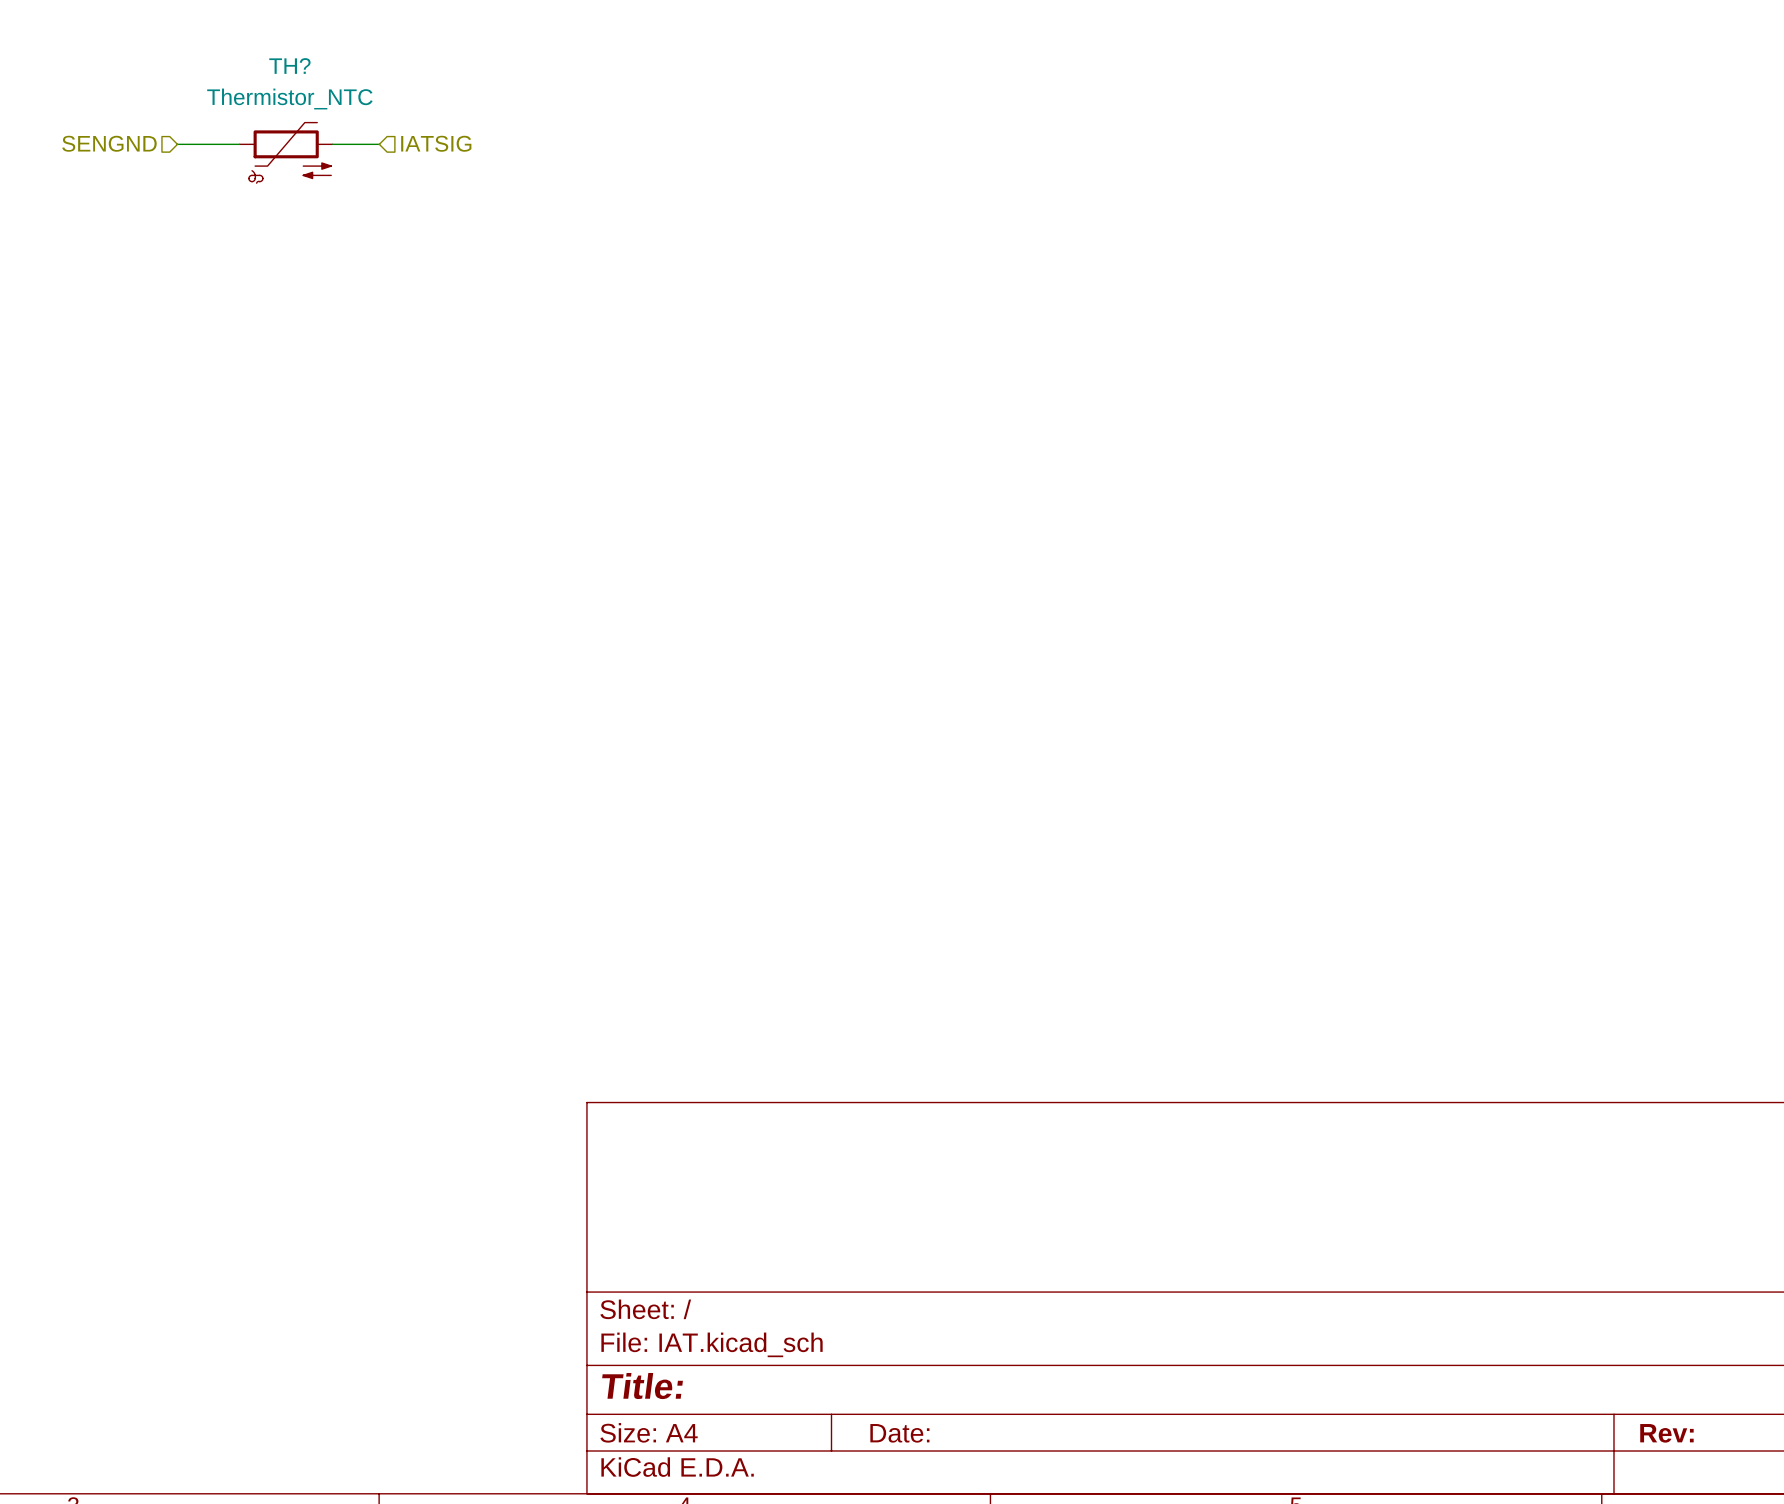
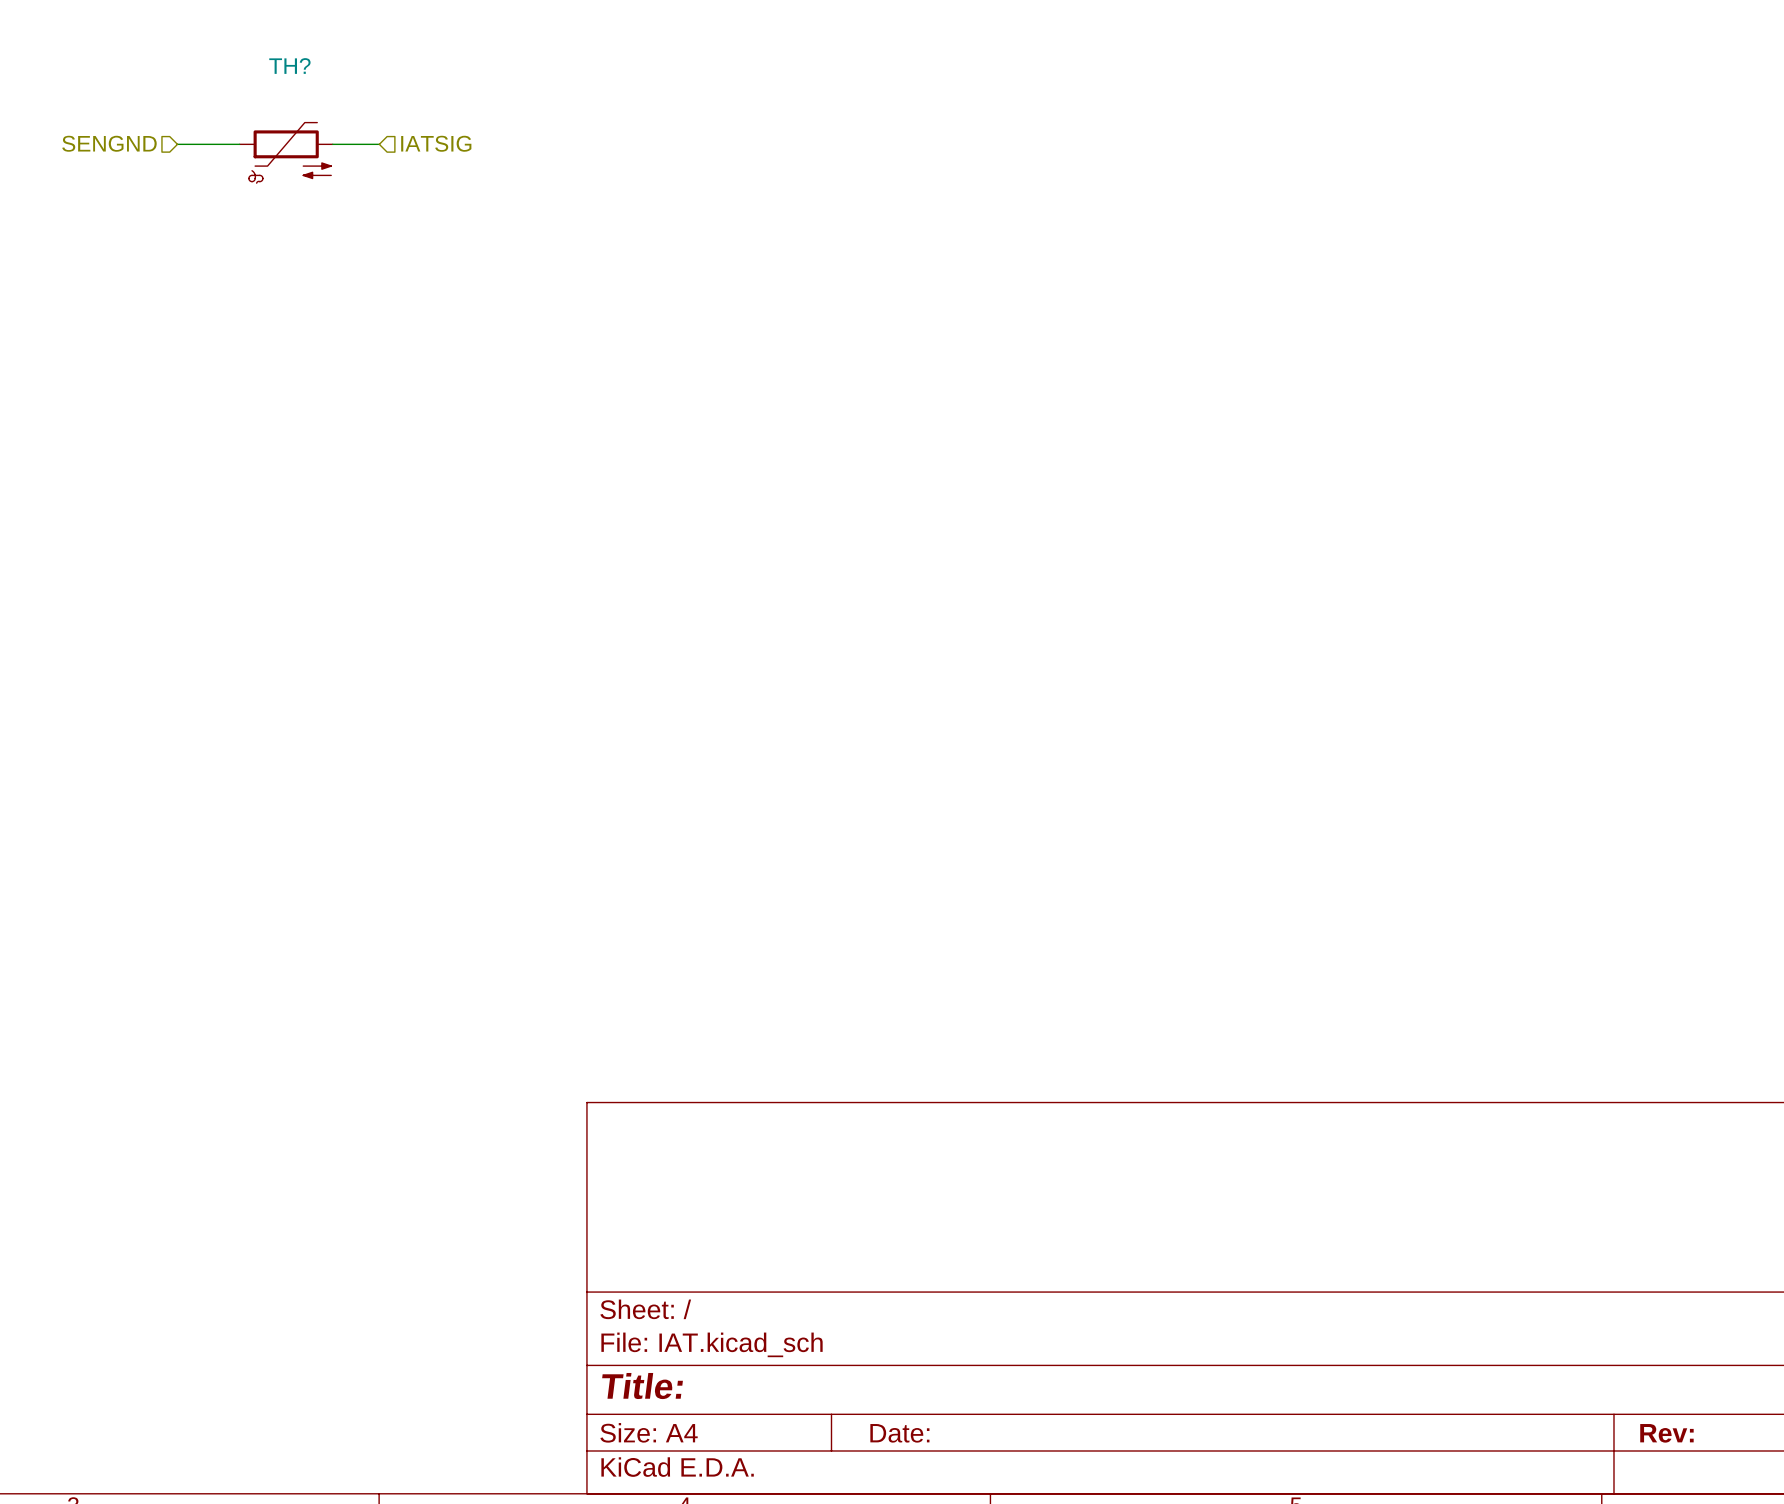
TH? value: Thermistor_NTC (289, 99) -> none

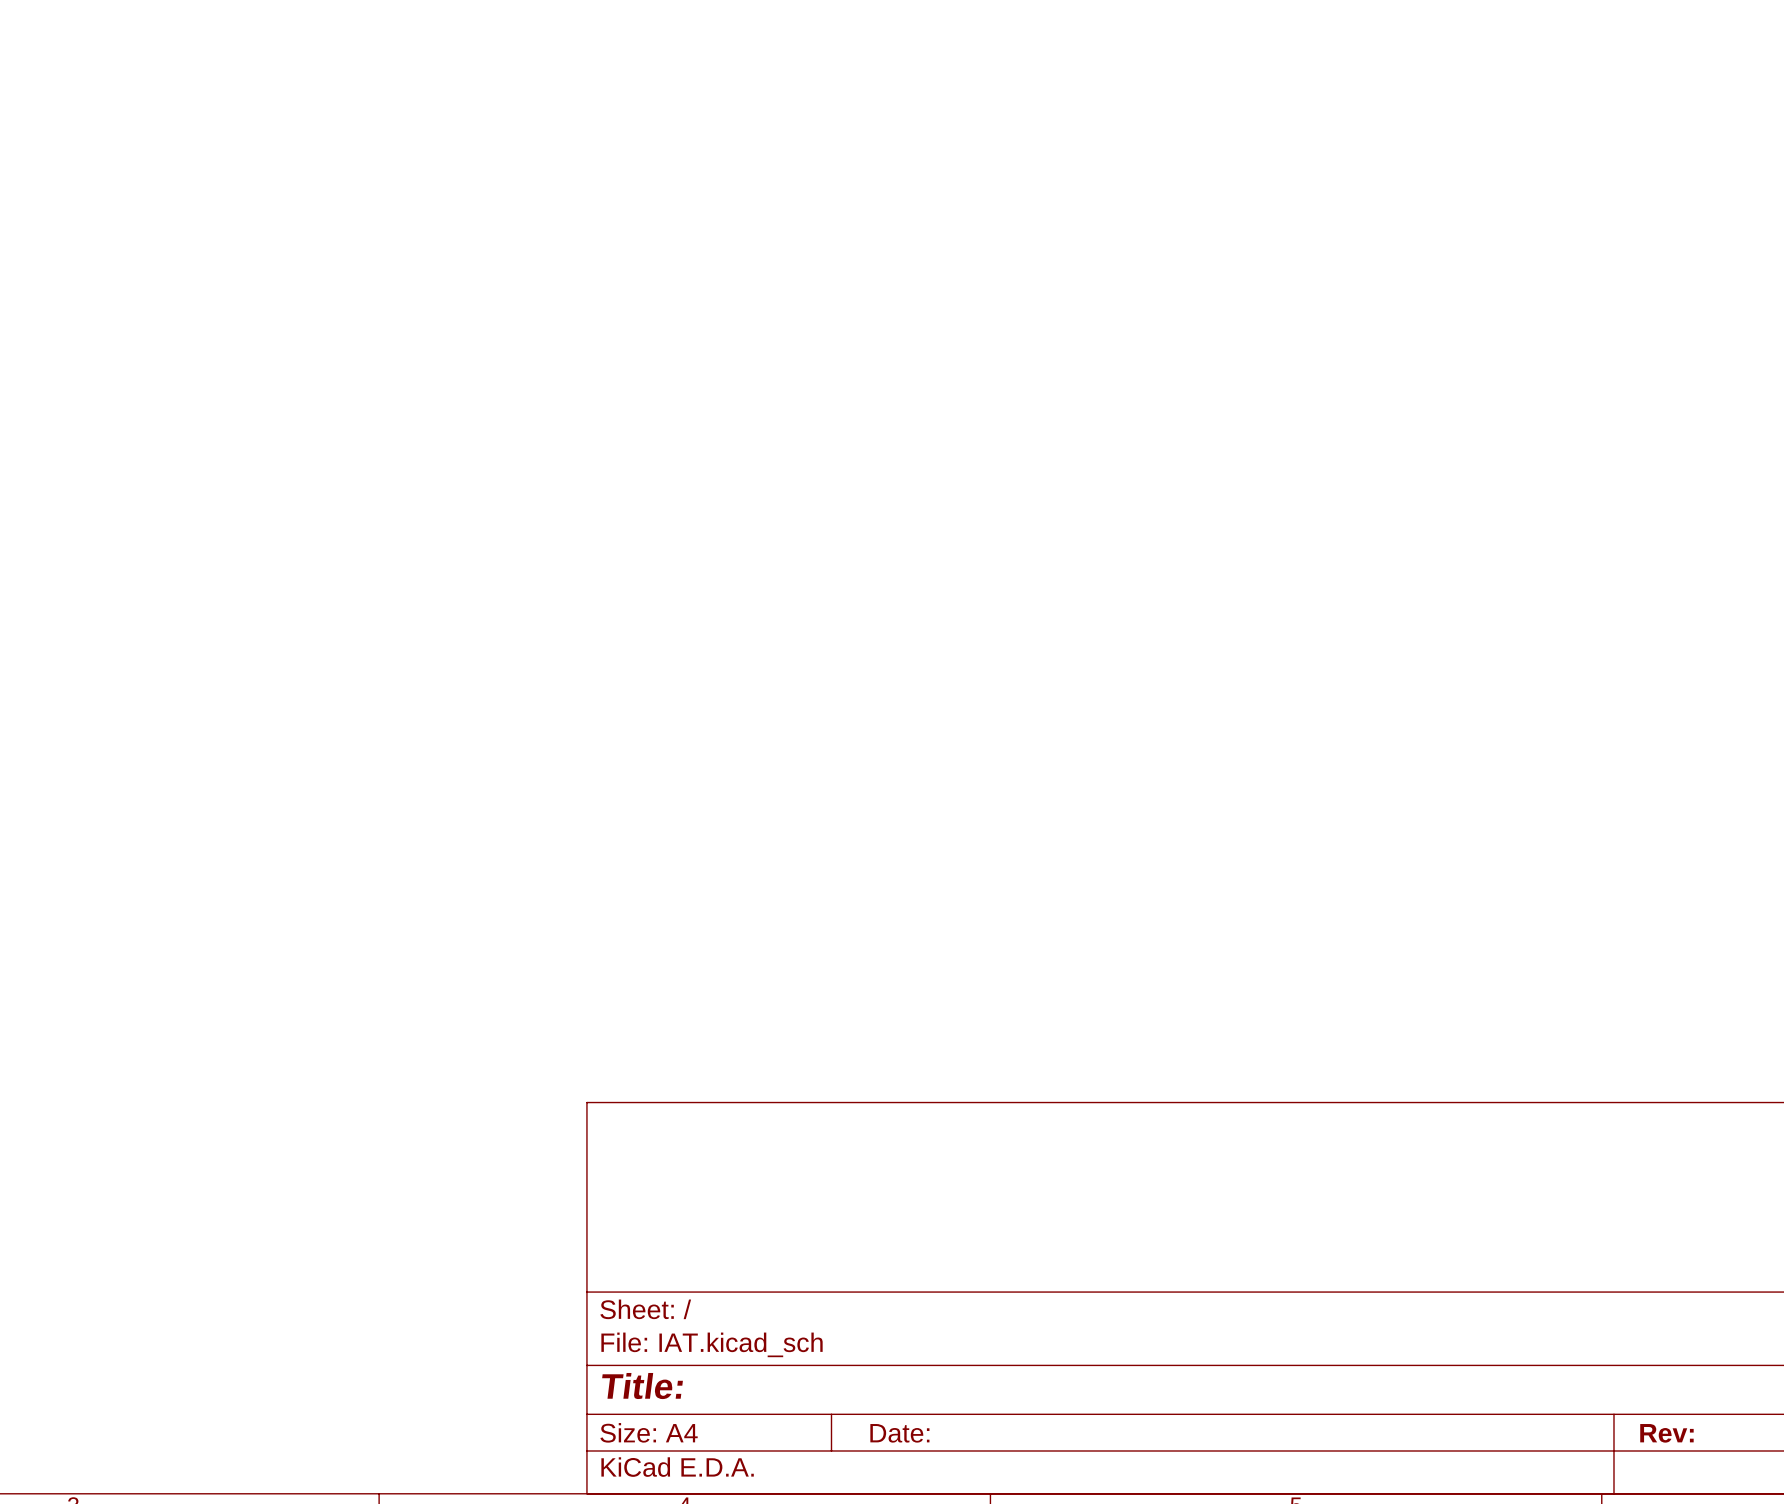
hierarchical label: SENGND (109, 143) -> none
hierarchical label: IATSIG (436, 143) -> none
wire: (177, 144) (239, 144) -> none
wire: (332, 144) (379, 144) -> none
TH?: (286, 152) -> none

